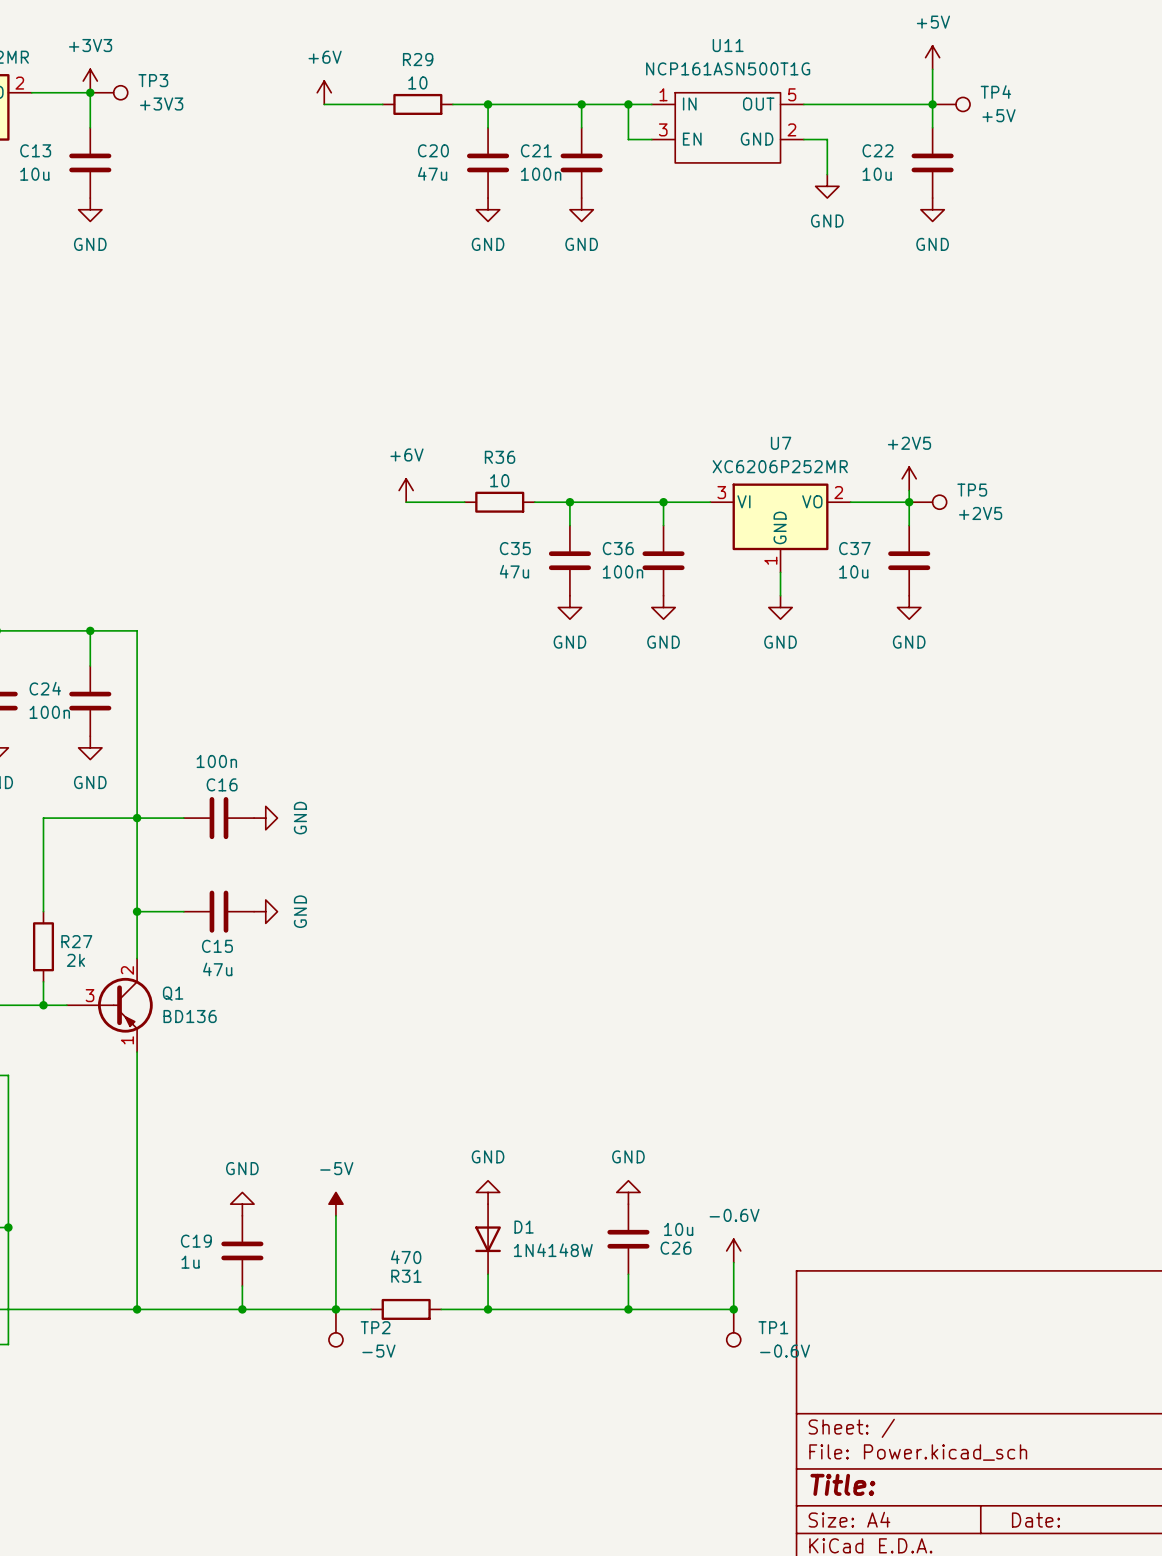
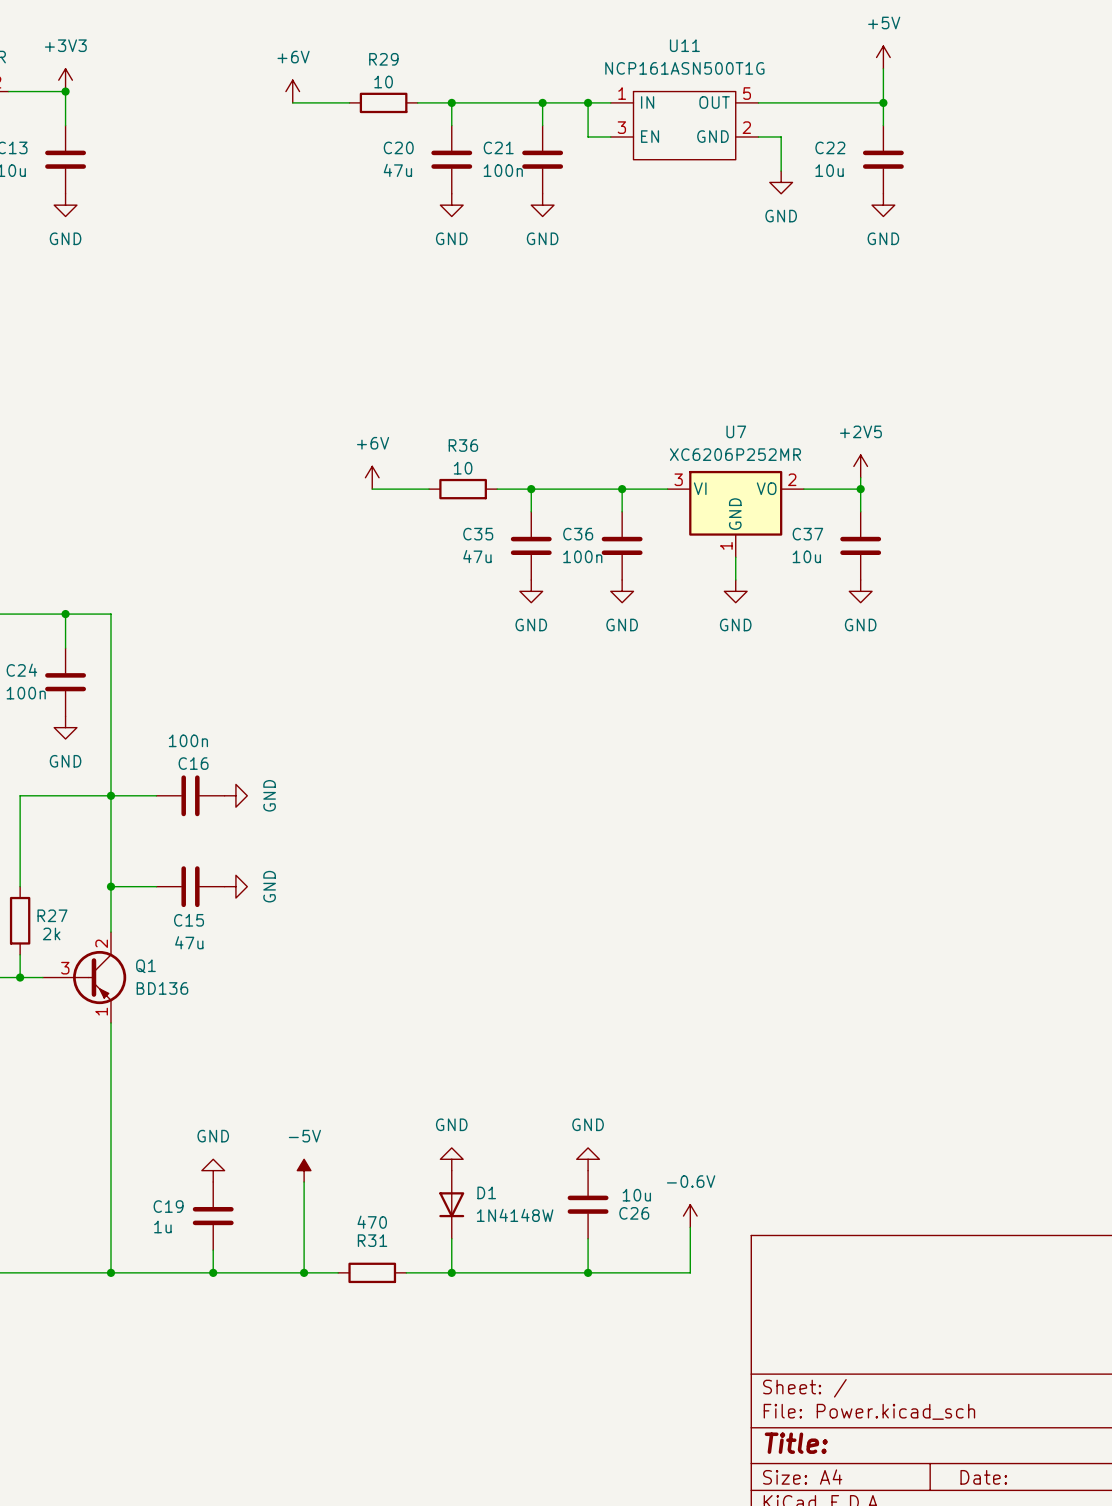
TP3: +3V3 (109, 92) -> none
TP4: +5V (951, 104) -> none
TP5: +2V5 (927, 502) -> none
junction: (733, 1309) -> none
TP2: -5V (335, 1328) -> none
TP1: -0.6V (733, 1328) -> none

